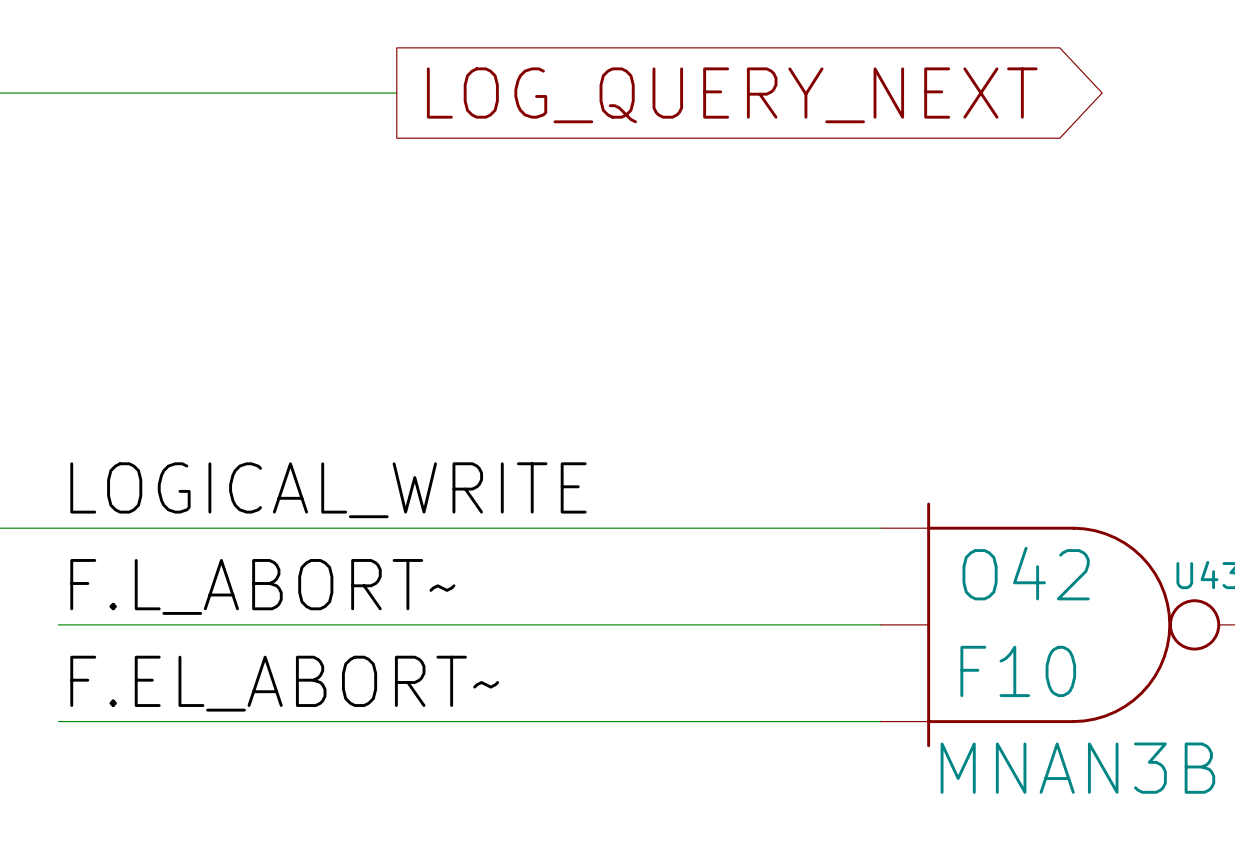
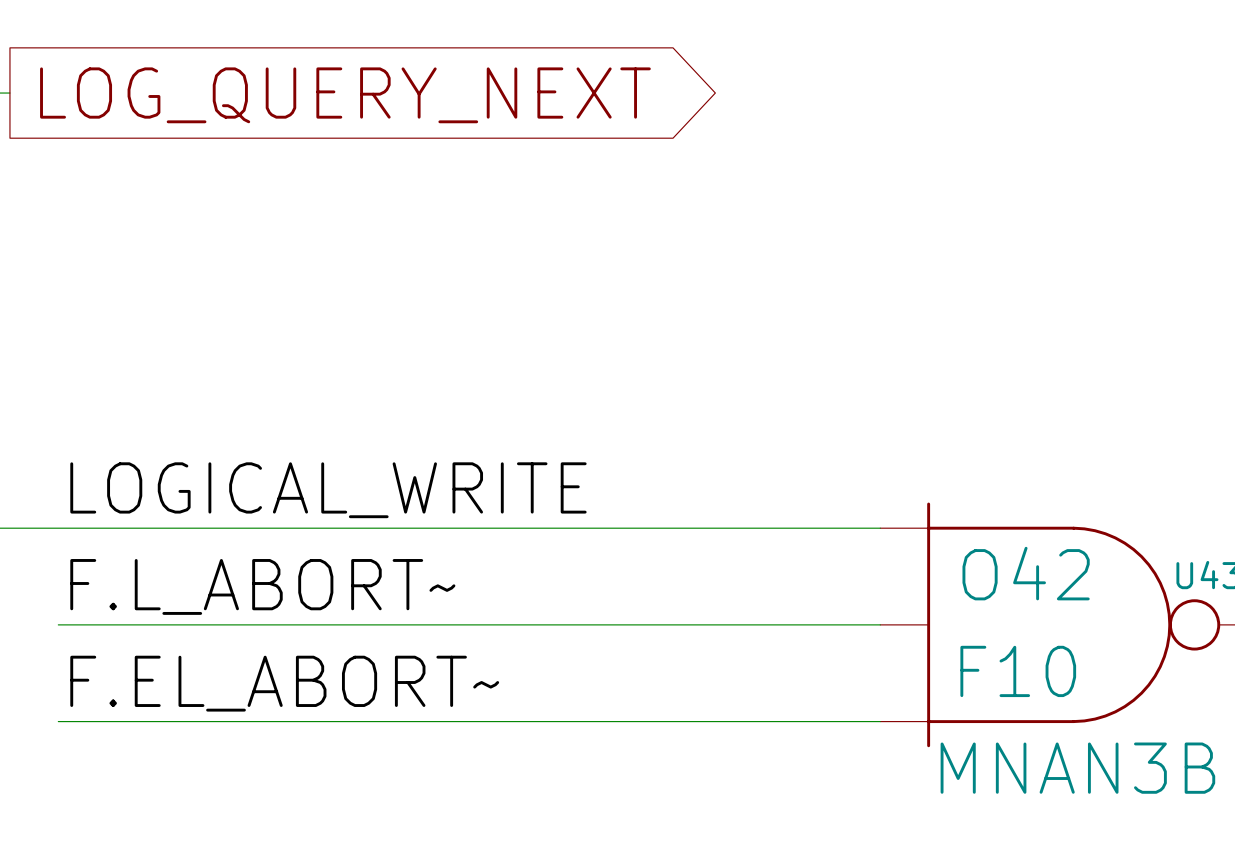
wire: (9, 93) (396, 93) -> none
global label position: LOG_QUERY_NEXT (732, 95) -> LOG_QUERY_NEXT (345, 95)

